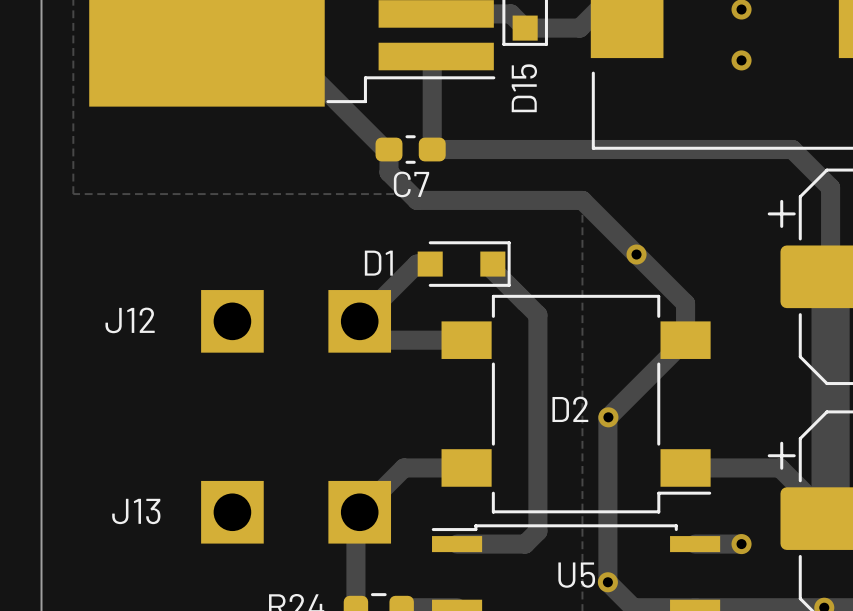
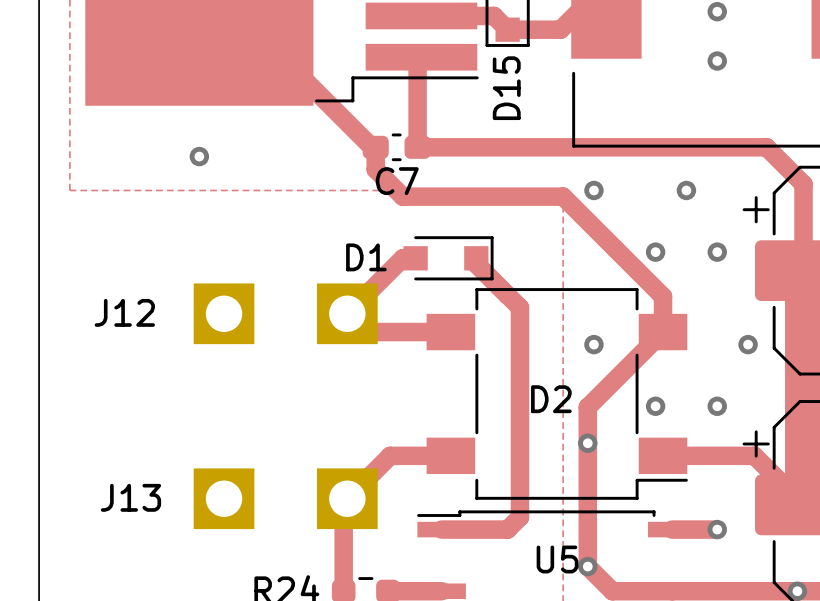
via: none -> (199, 156)
via: none -> (593, 190)
via: none -> (686, 190)
via: (636, 254) -> none
via: none -> (655, 252)
via: none -> (717, 252)
via: none -> (593, 344)
via: none -> (748, 344)
via: none -> (655, 406)
via: none -> (717, 406)
via: (608, 417) -> none
via: none -> (587, 443)

